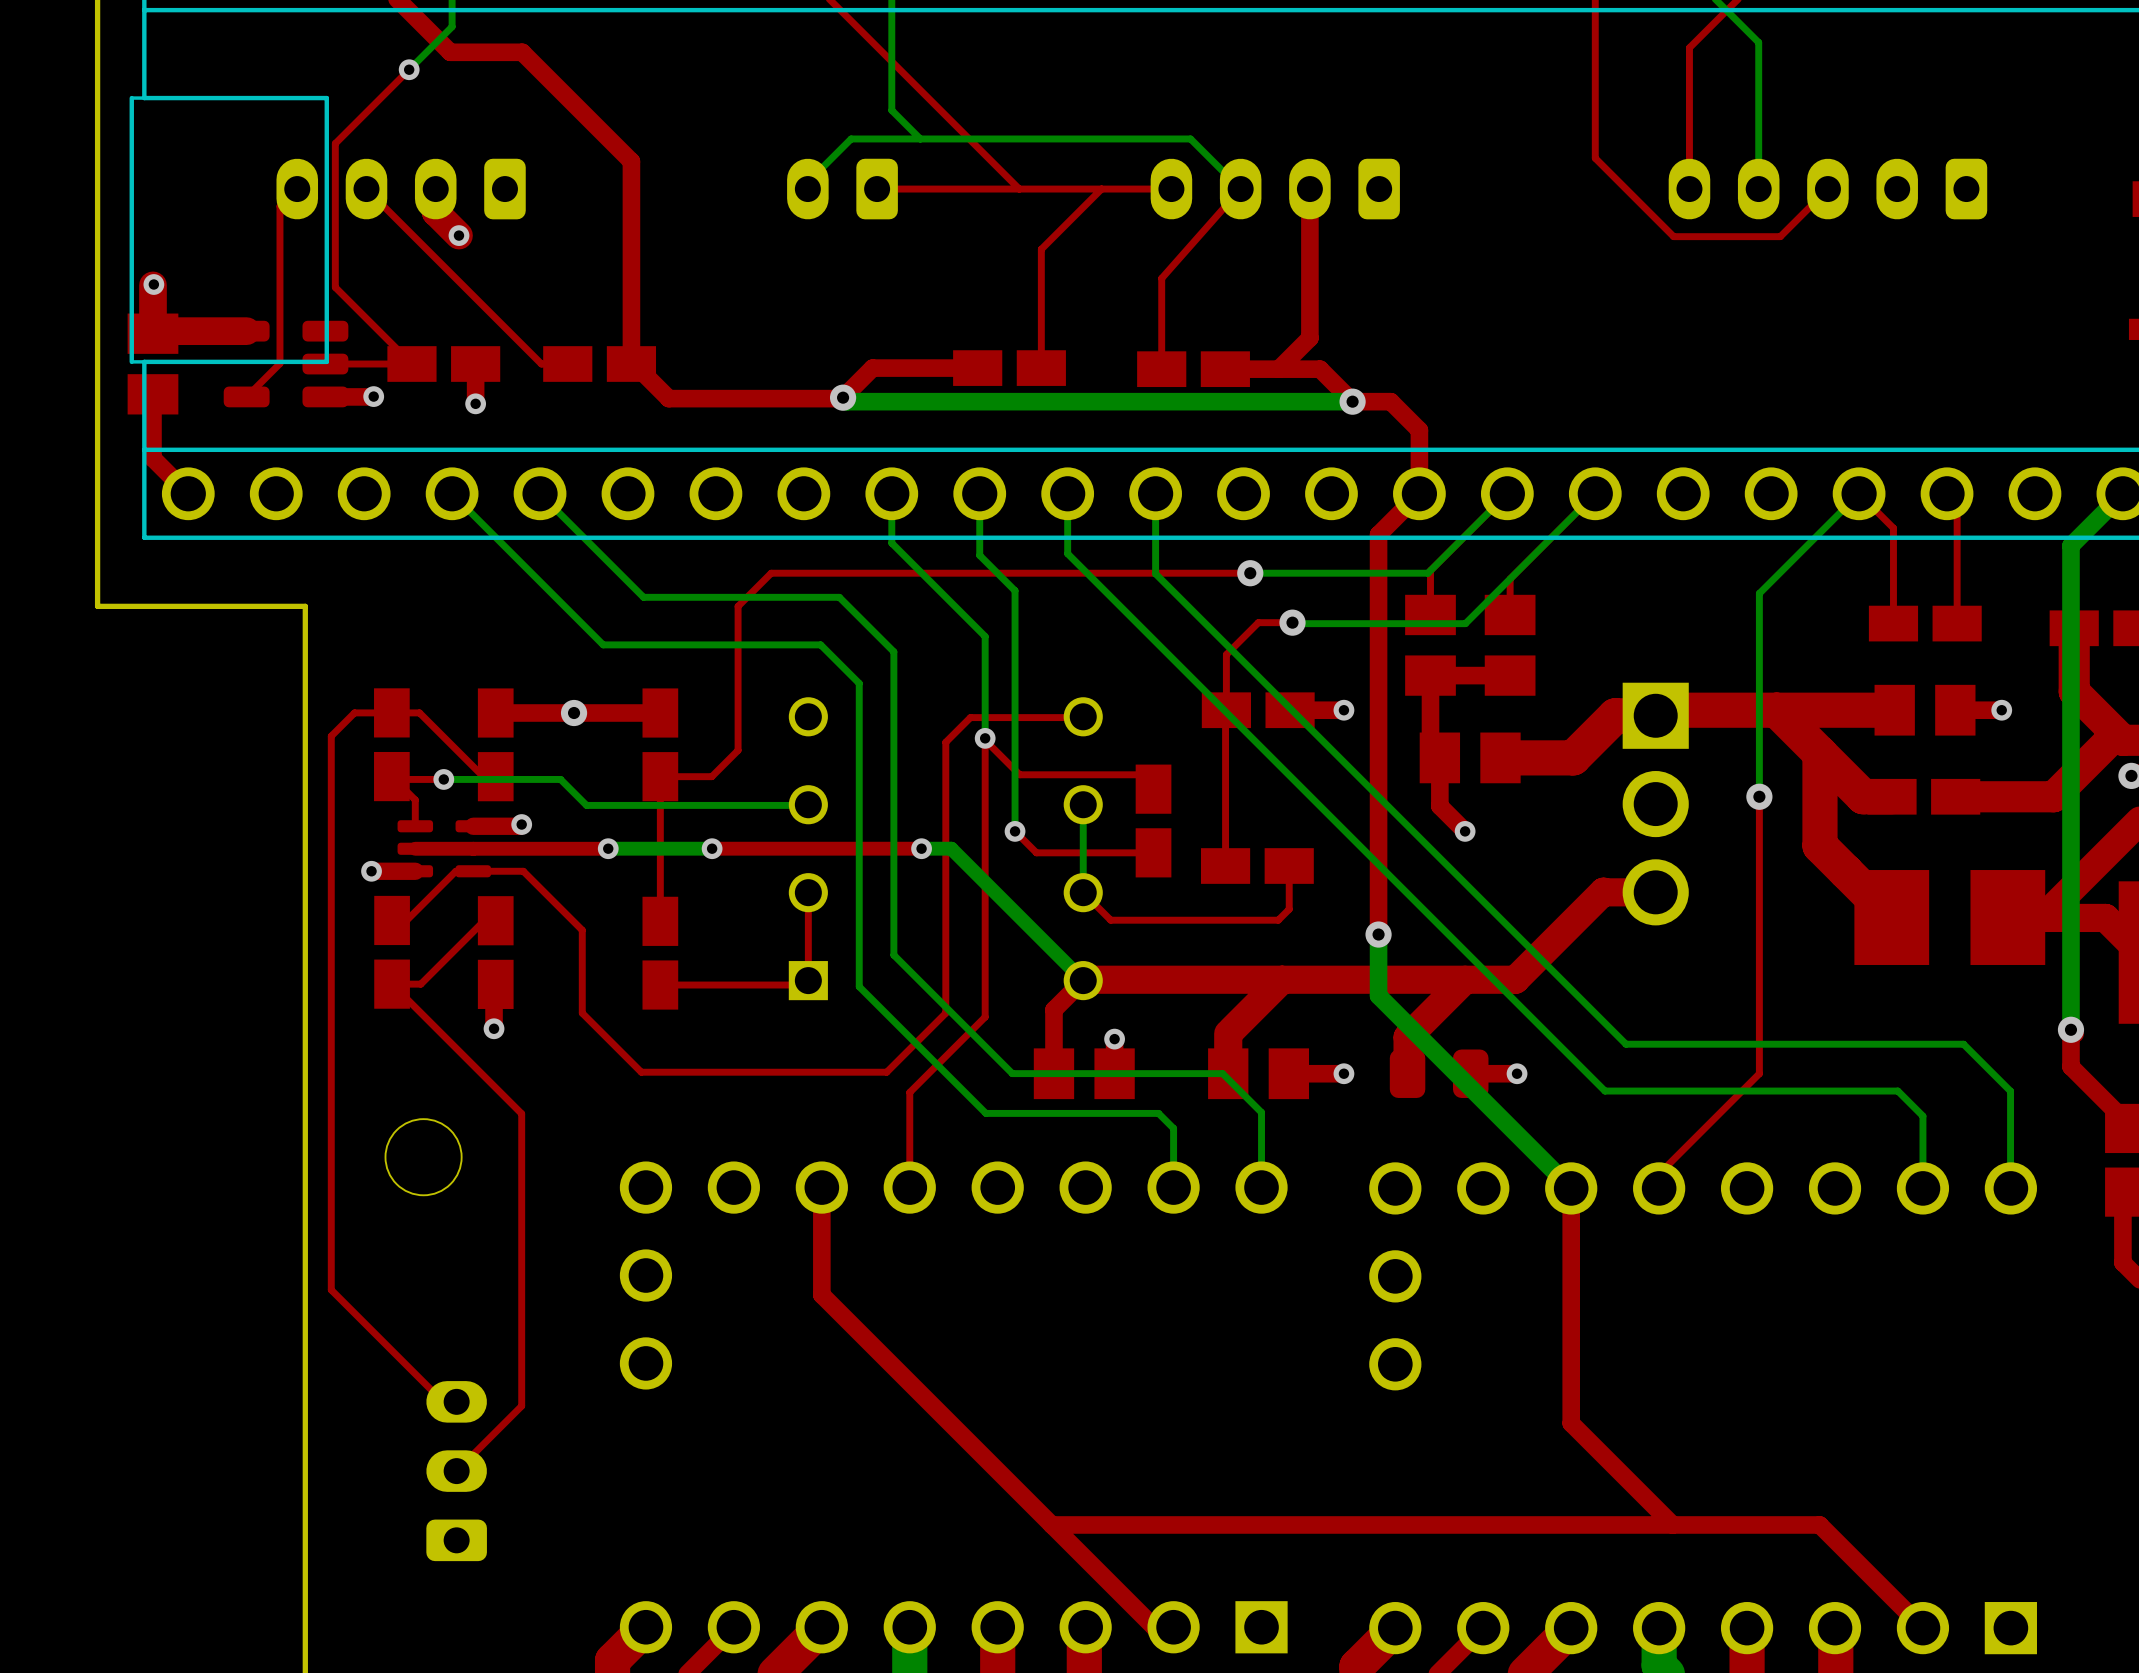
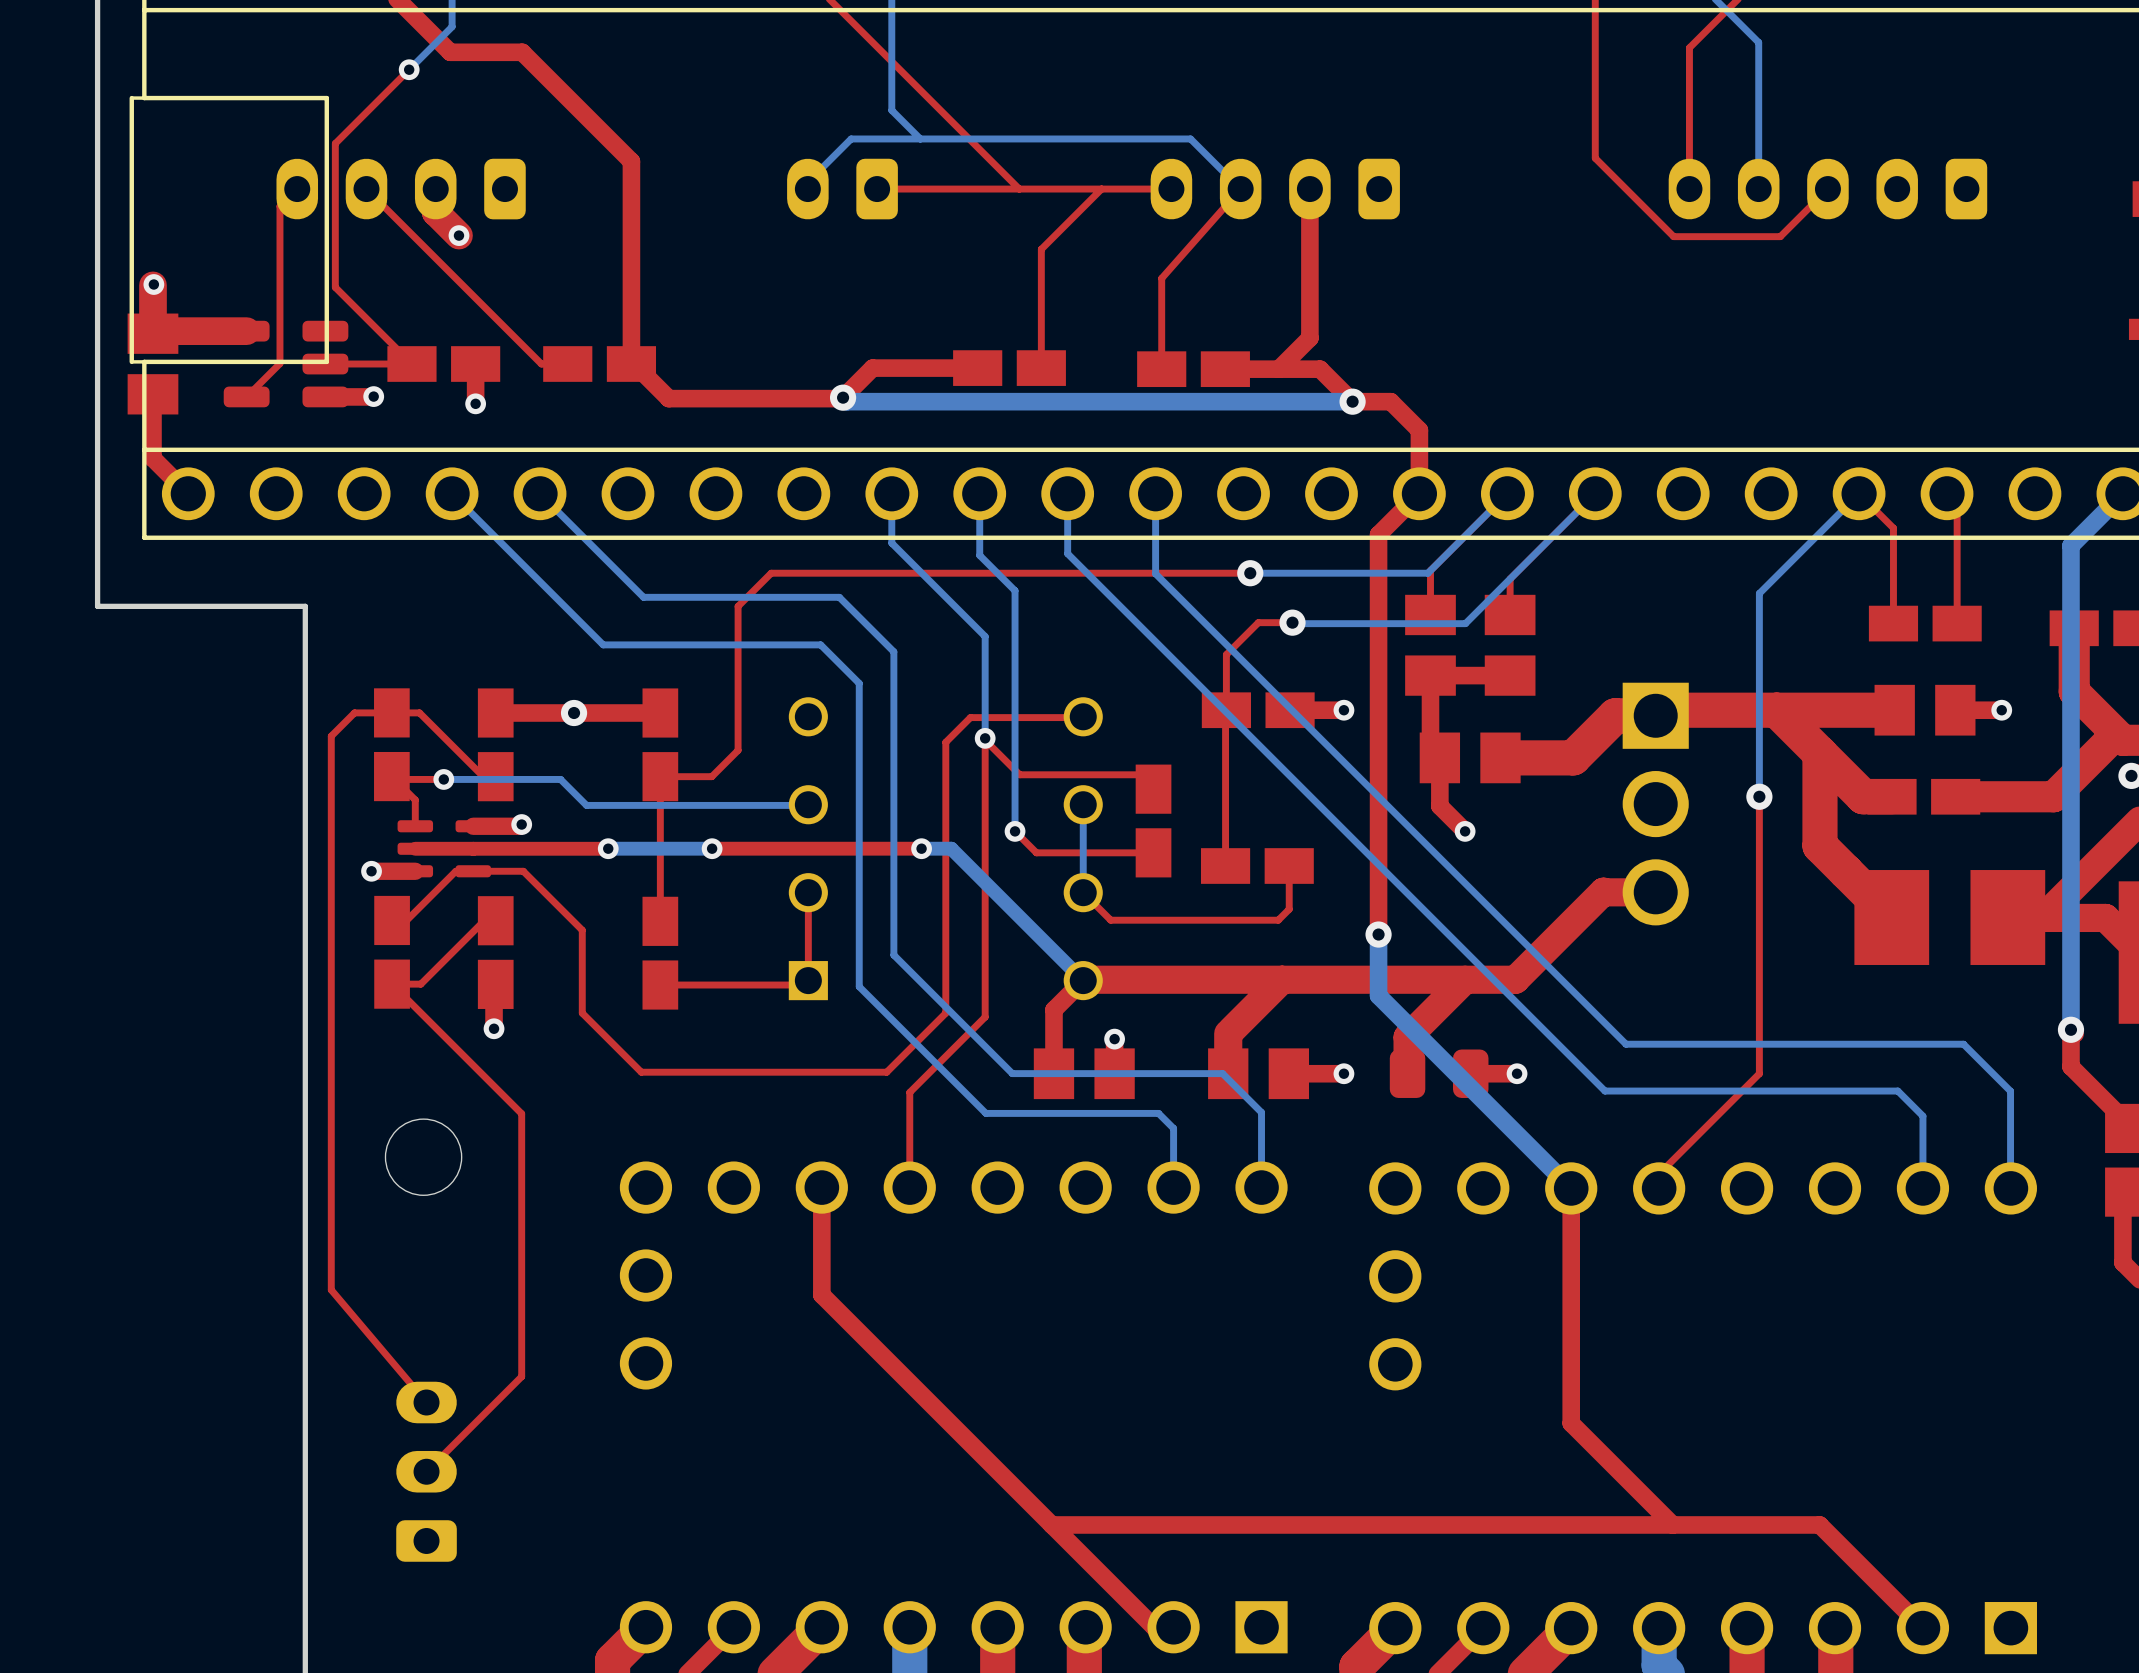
top track: (331, 1289) (443, 1401) (456, 1401) -> (331, 1289) (426, 1402)
top track: (521, 1376) (521, 1406) (456, 1471) -> (521, 1376) (426, 1471)
part position: (456, 1471) -> (426, 1471)

